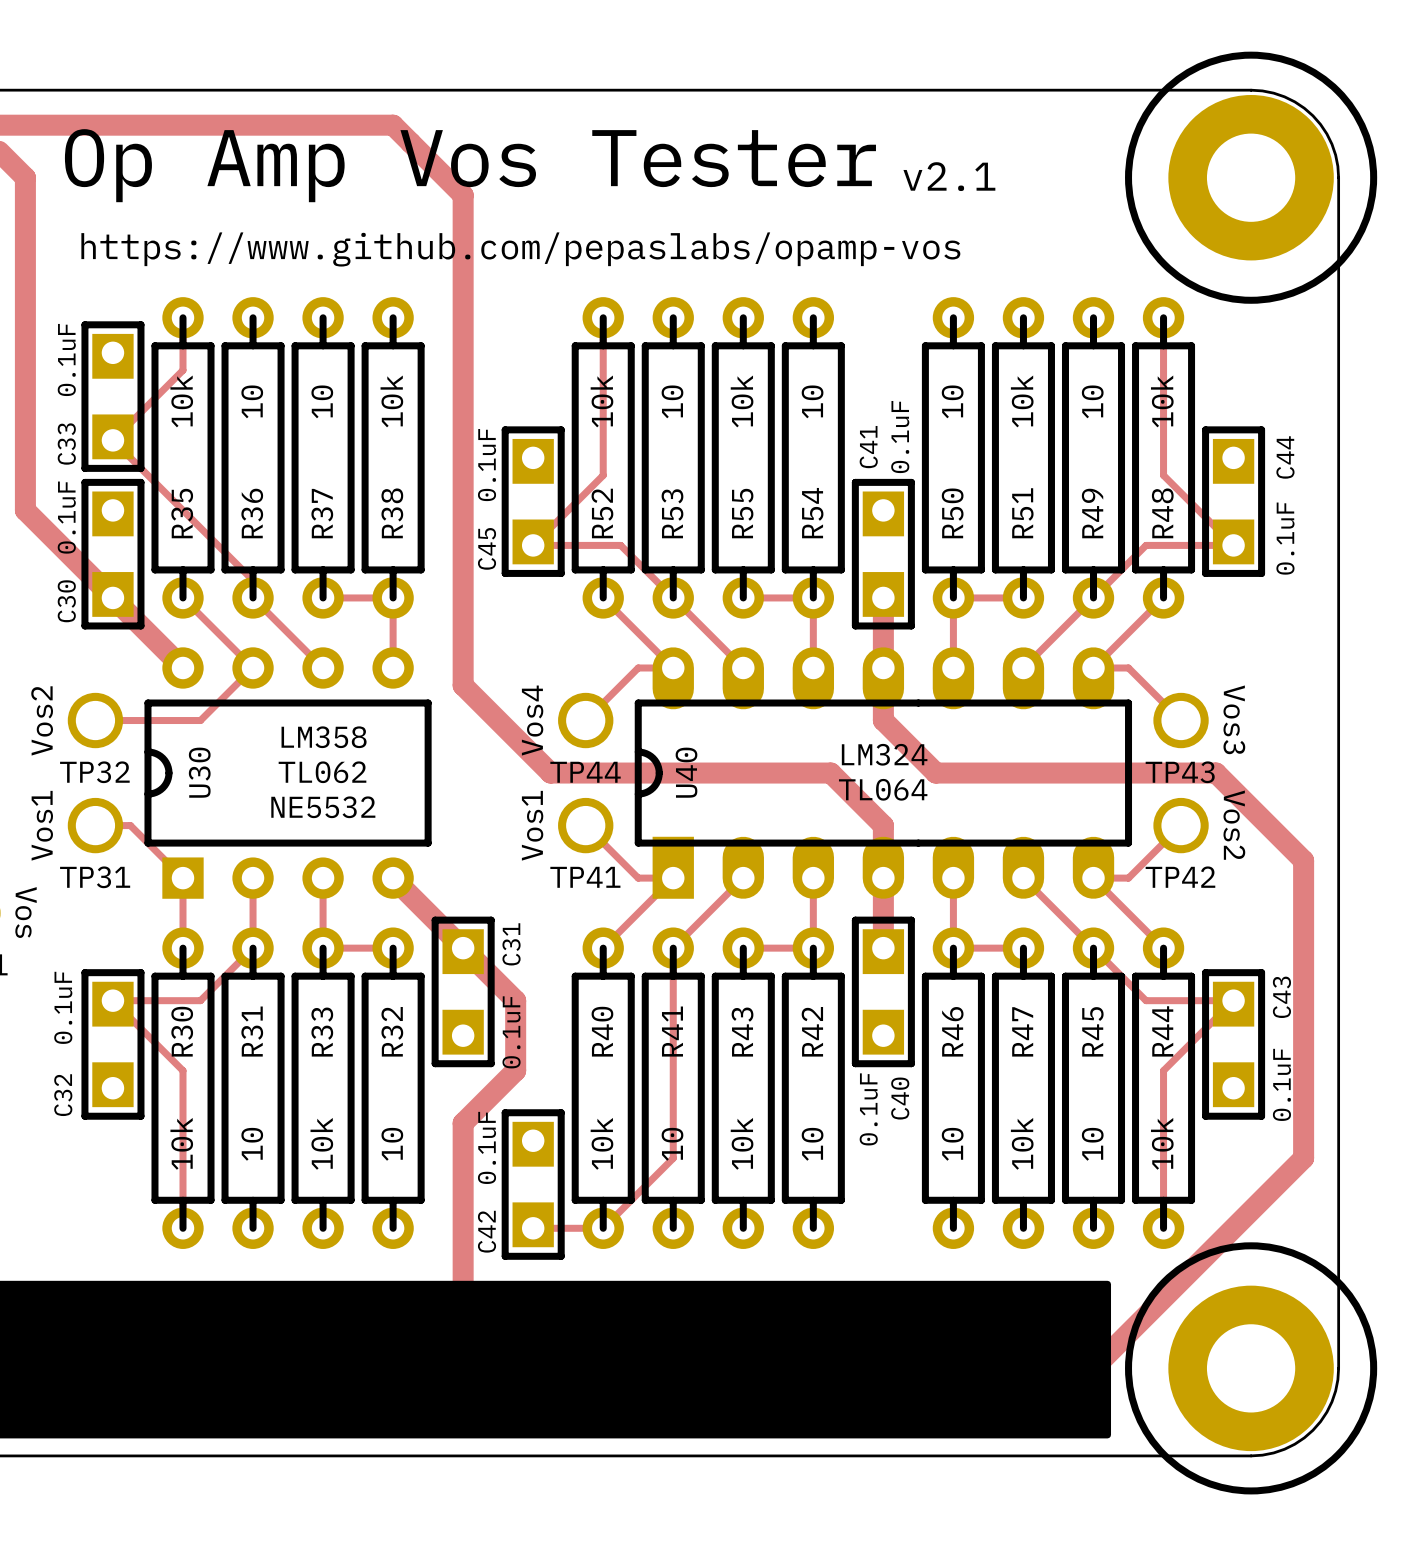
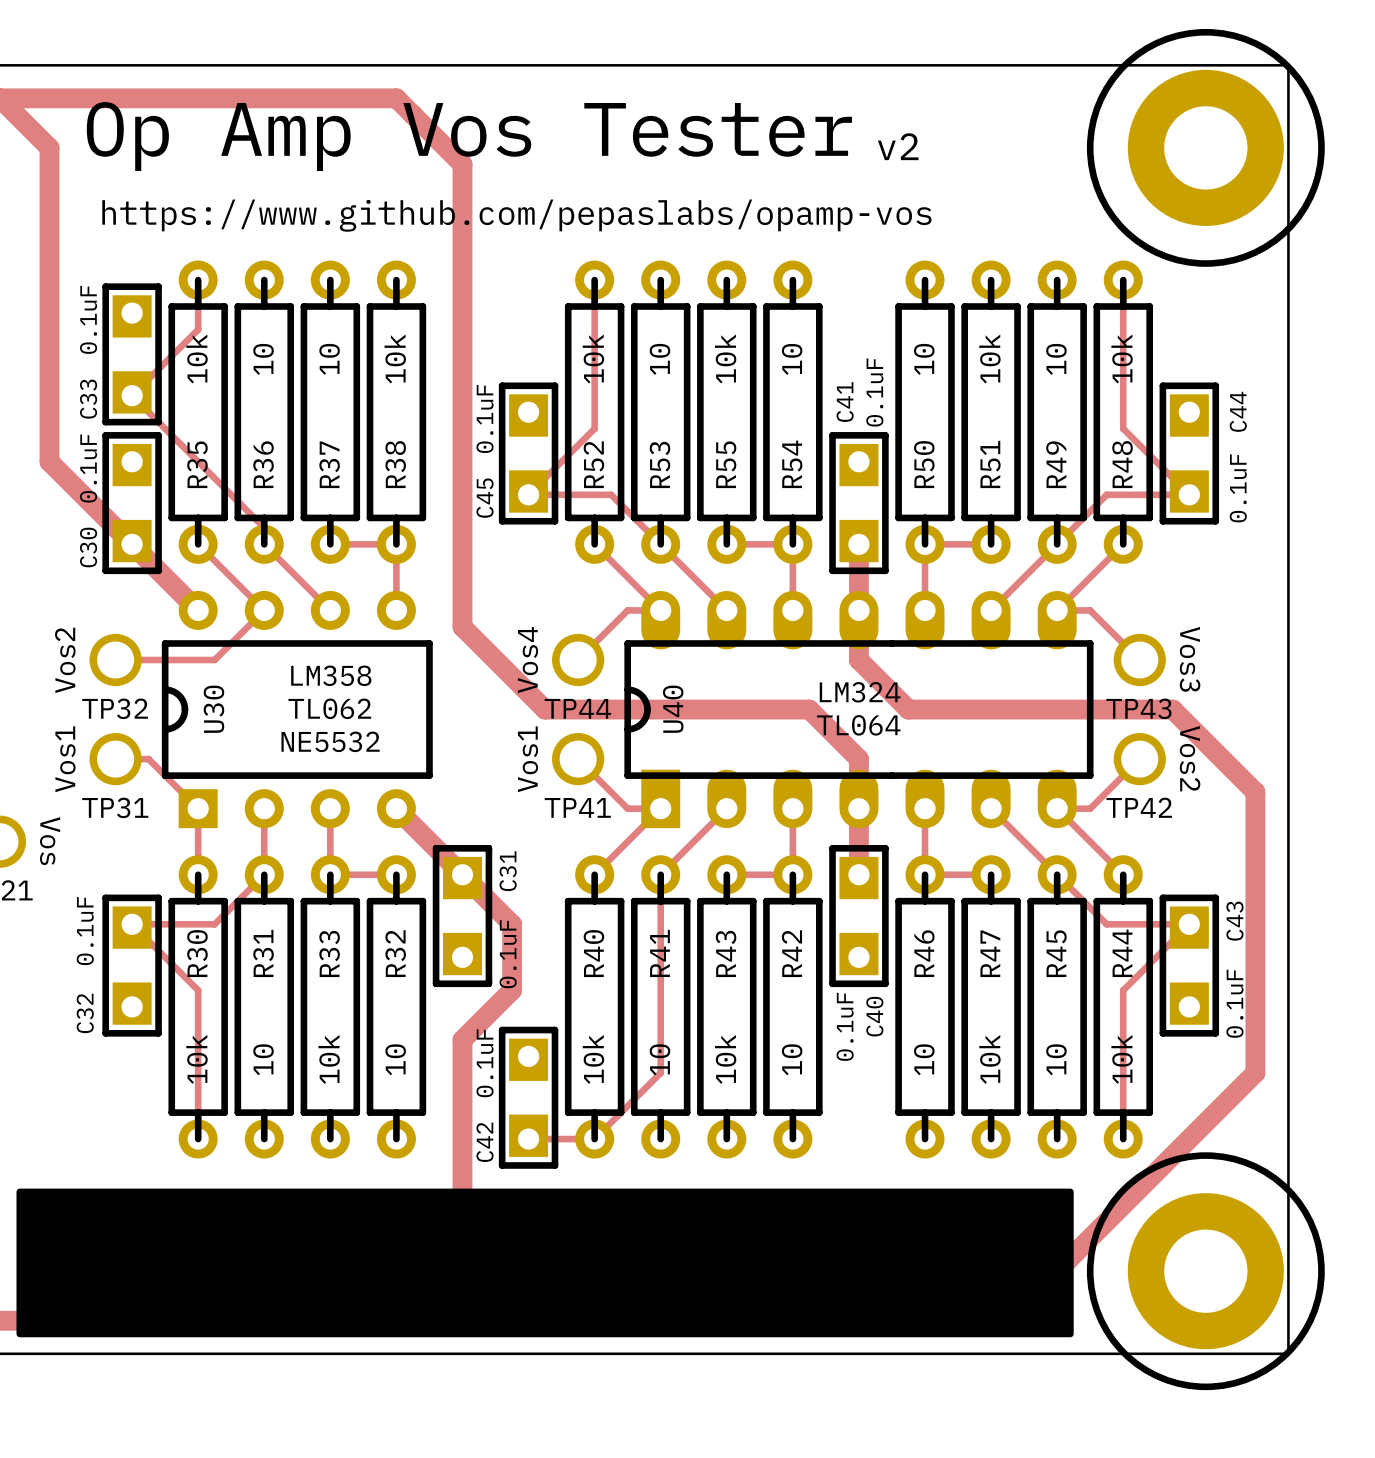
board edge: (1251, 90) (1284, 96) (1312, 115) (1331, 144) (1338, 177) -> (1205, 65) (1288, 65) (1288, 147)
text: v2.1 (949, 176) -> v2 (898, 146)
board edge: (1338, 1368) (1331, 1401) (1312, 1430) (1284, 1449) (1251, 1455) -> (1288, 1271) (1288, 1353) (1205, 1353)

